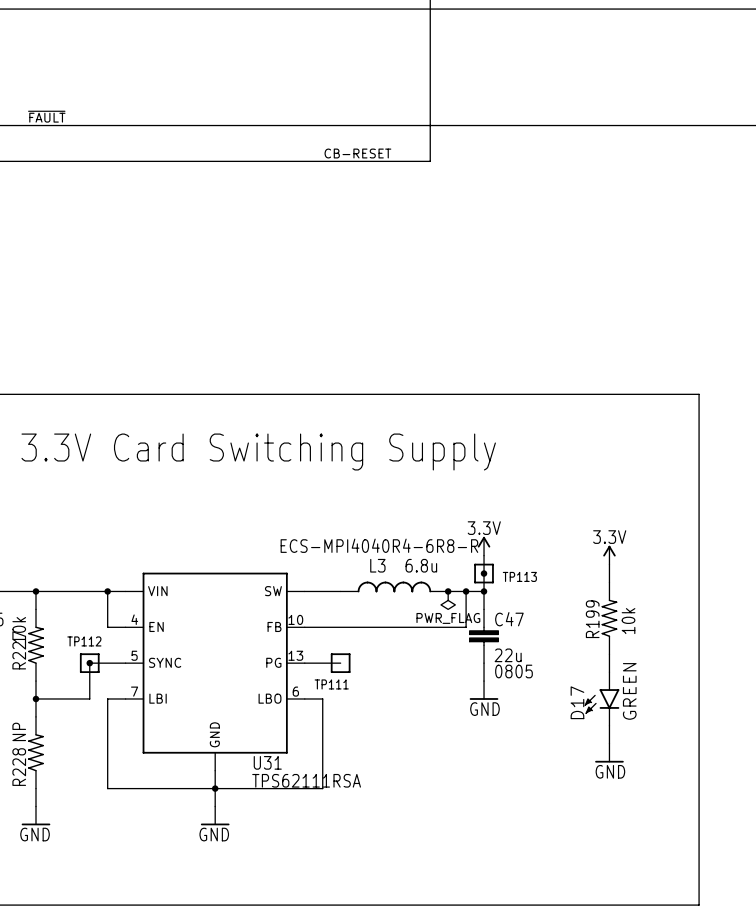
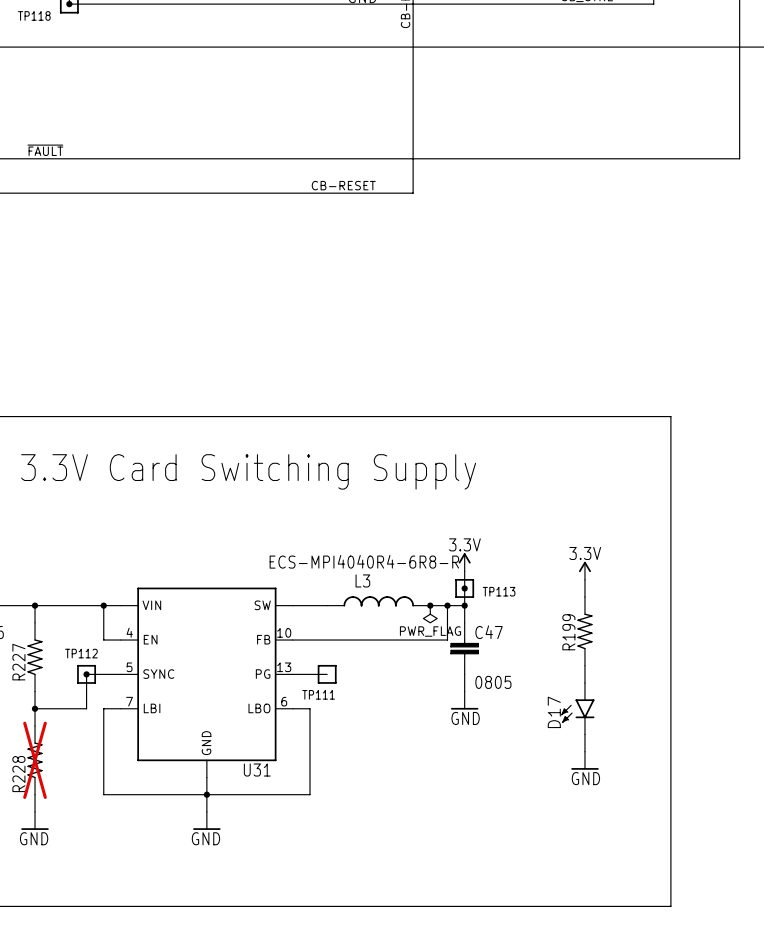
L3 value: 6.8u (421, 565) -> none
R199 value: 10k (628, 621) -> none
R227 value: 10k (19, 630) -> none
C47 value: 22u (508, 655) -> none
D17 value: GREEN (629, 691) -> none
R228 value: NP (19, 731) -> none
R228 do-not-place cross: none -> (35, 760)
U31 value: TPS62111RSA (306, 780) -> none

